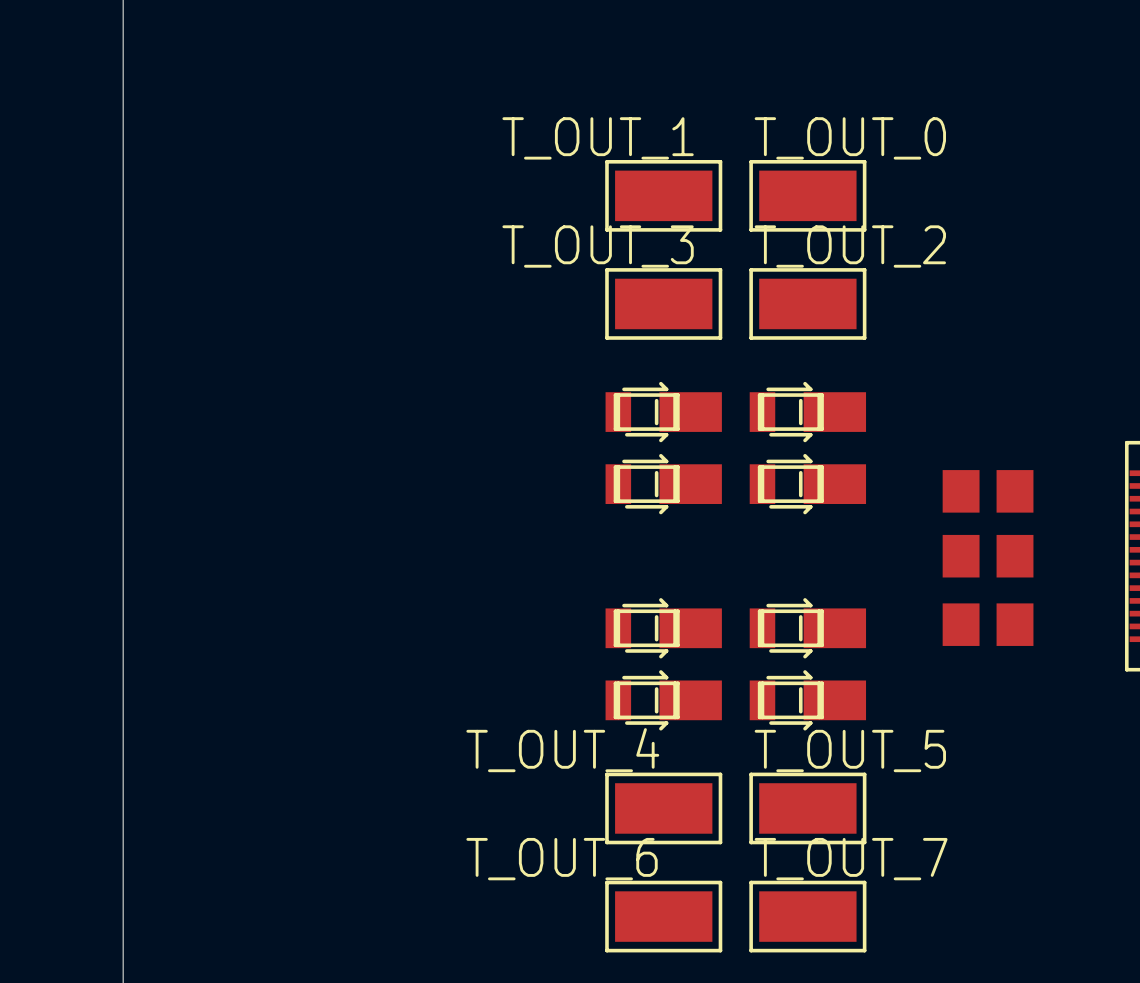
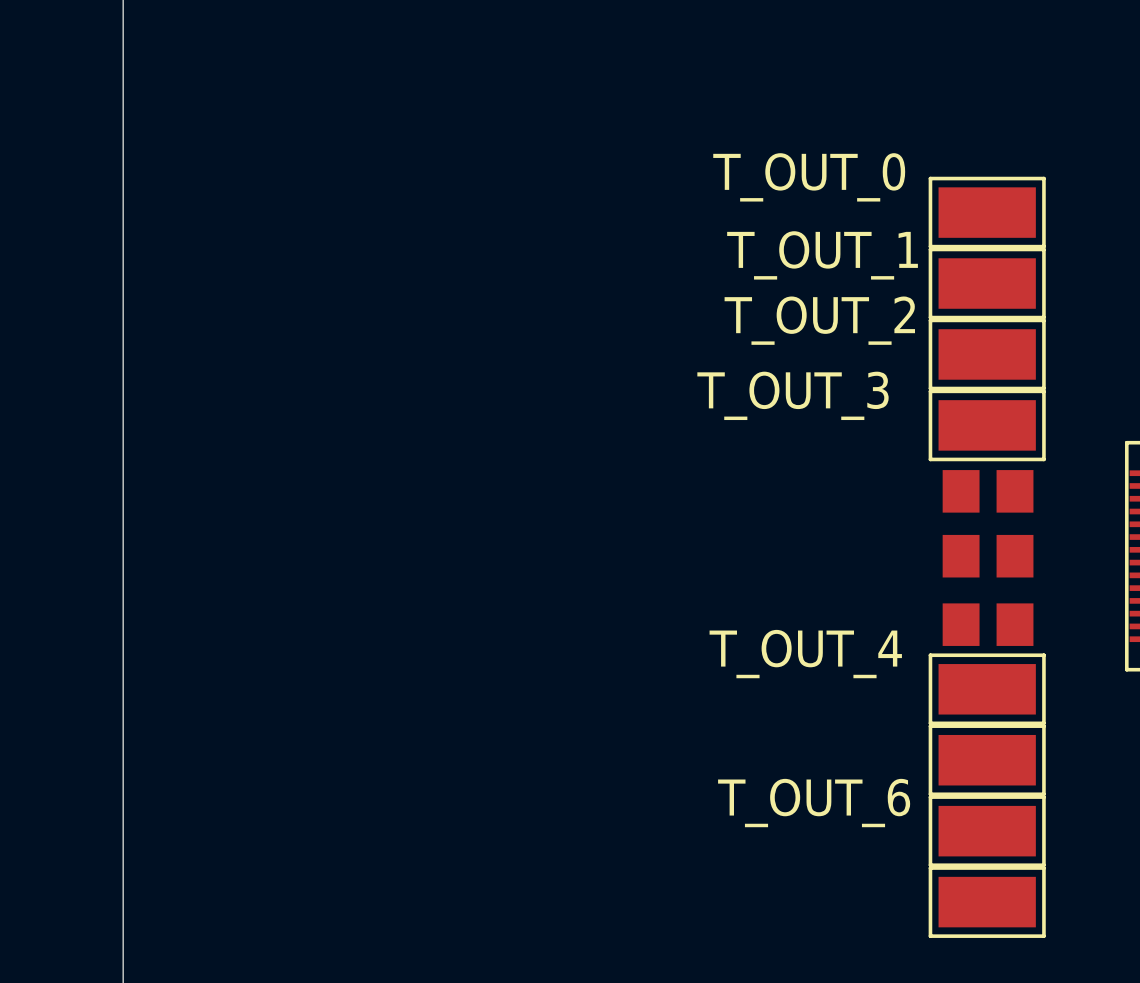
T_OUT_1 name position: T_OUT_1 (598, 138) -> T_OUT_1 (822, 255)
T_OUT_0 name position: T_OUT_0 (850, 138) -> T_OUT_0 (809, 177)
T_OUT_1 position: (663, 195) -> (987, 283)
T_OUT_0 position: (807, 195) -> (987, 212)
T_OUT_3 name position: T_OUT_3 (598, 246) -> T_OUT_3 (793, 395)
T_OUT_2 name position: T_OUT_2 (850, 246) -> T_OUT_2 (819, 320)
T_OUT_3 position: (663, 303) -> (987, 425)
T_OUT_2 position: (807, 303) -> (987, 354)
part: (663, 412) -> none
part: (807, 412) -> none
part: (663, 484) -> none
part: (807, 484) -> none
part: (663, 628) -> none
part: (807, 628) -> none
part: (663, 700) -> none
part: (807, 700) -> none
T_OUT_4 name position: T_OUT_4 (562, 750) -> T_OUT_4 (805, 654)
part: none -> (987, 760)
T_OUT_4 position: (663, 808) -> (987, 689)
T_OUT_5: (807, 808) -> none
T_OUT_6 name position: T_OUT_6 (562, 859) -> T_OUT_6 (814, 803)
part: none -> (987, 902)
T_OUT_6 position: (663, 916) -> (987, 831)
T_OUT_7: (807, 916) -> none

